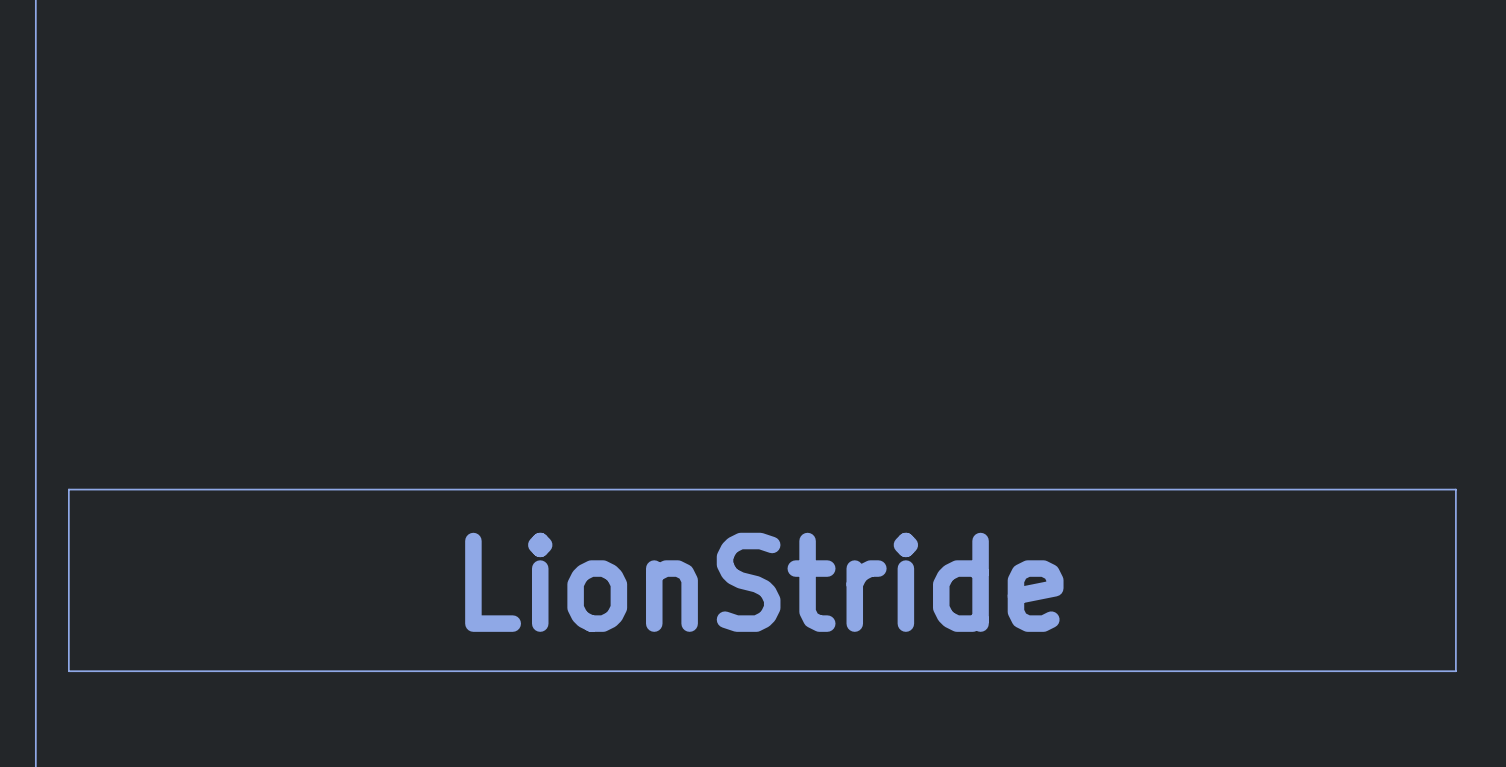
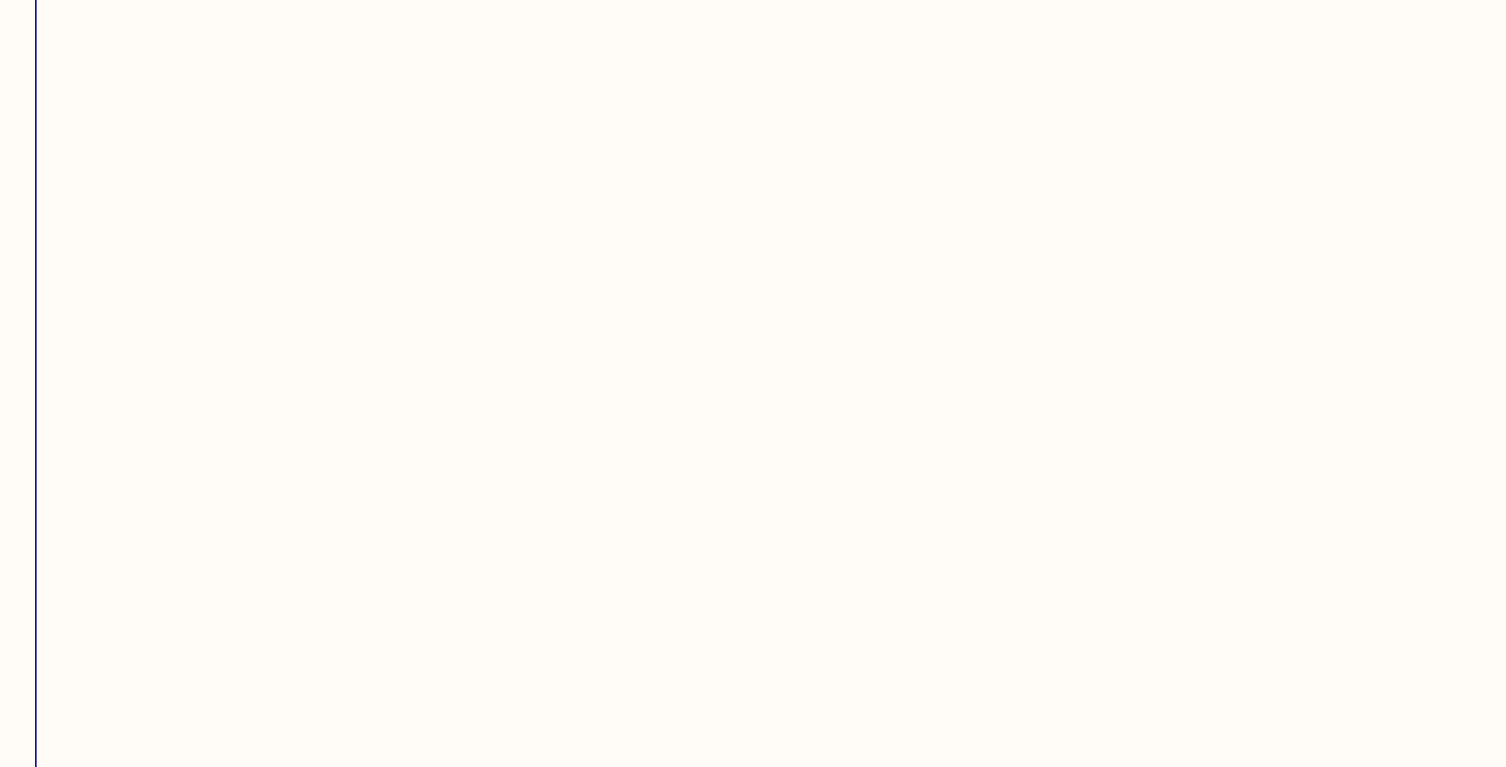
line: (68, 489) (1455, 489) (1455, 671) (68, 671) (68, 489) -> none
text: LionStride (764, 582) -> none

